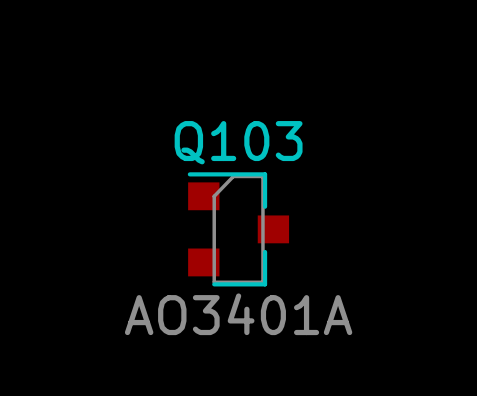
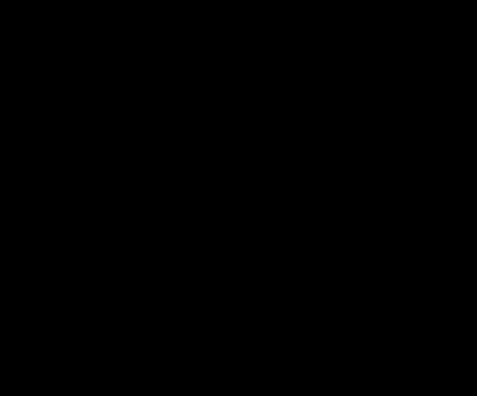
Q103: AO3401A (238, 229) -> none

